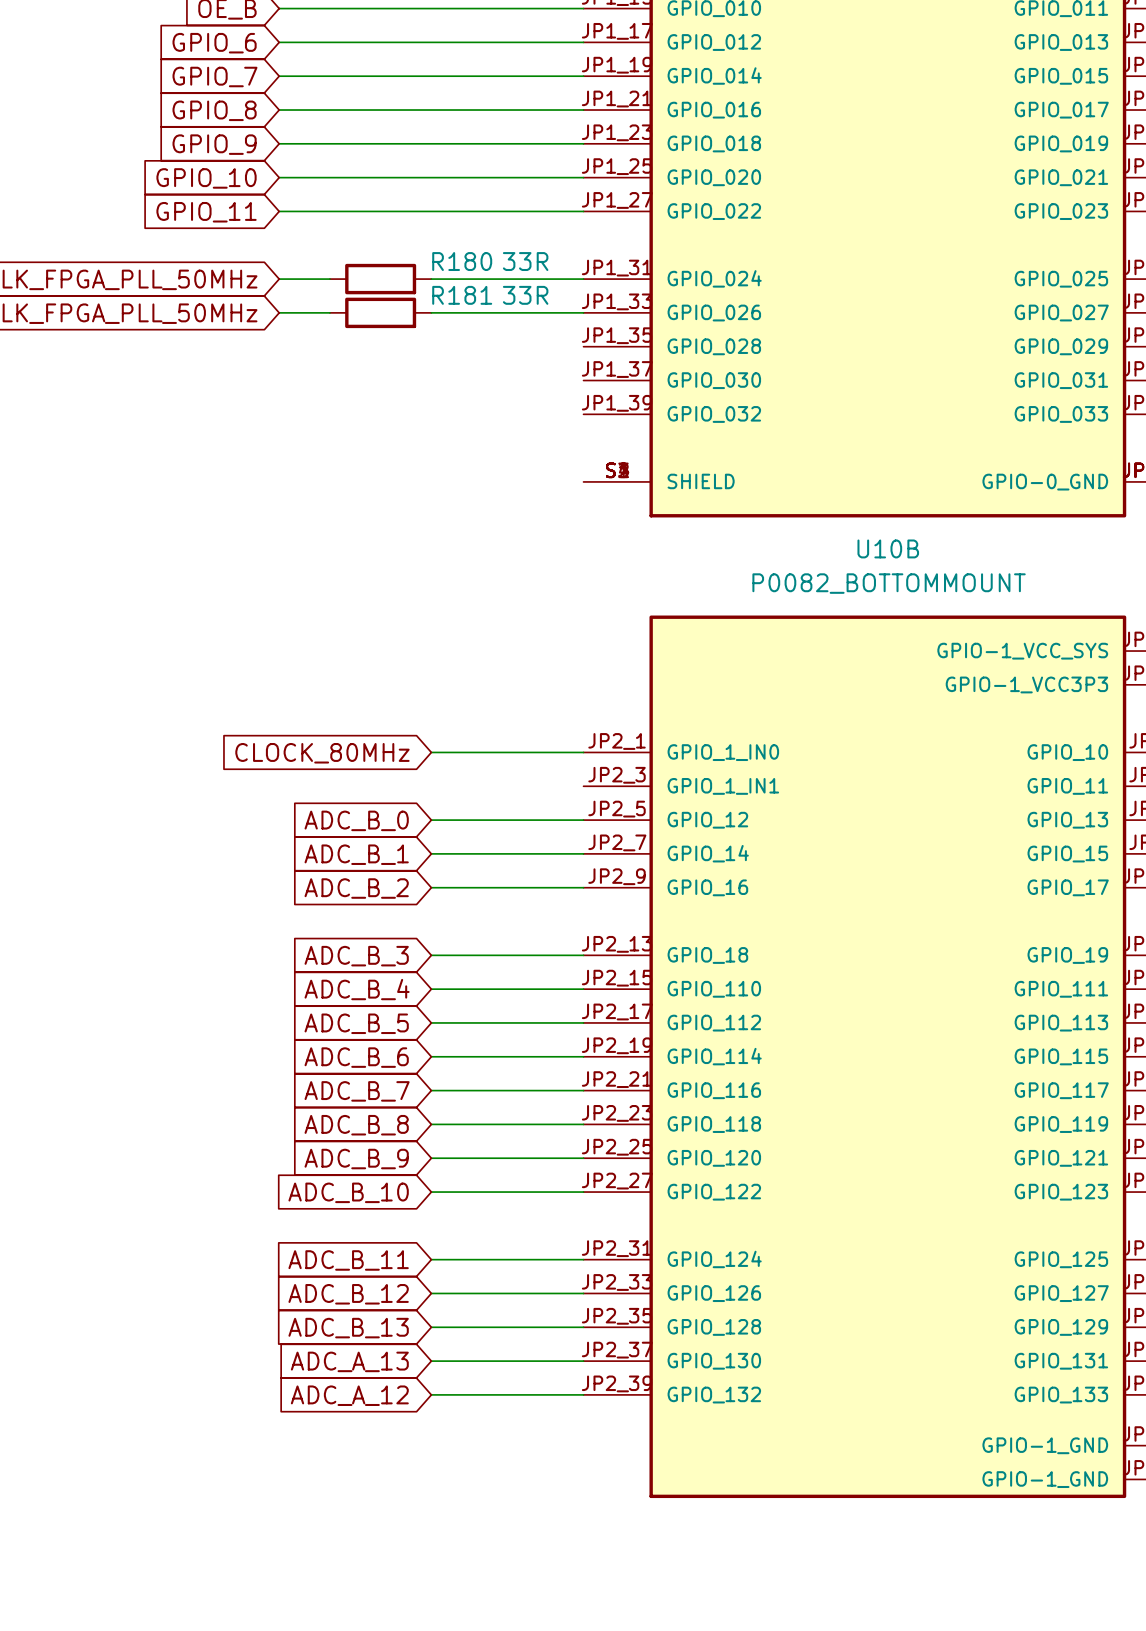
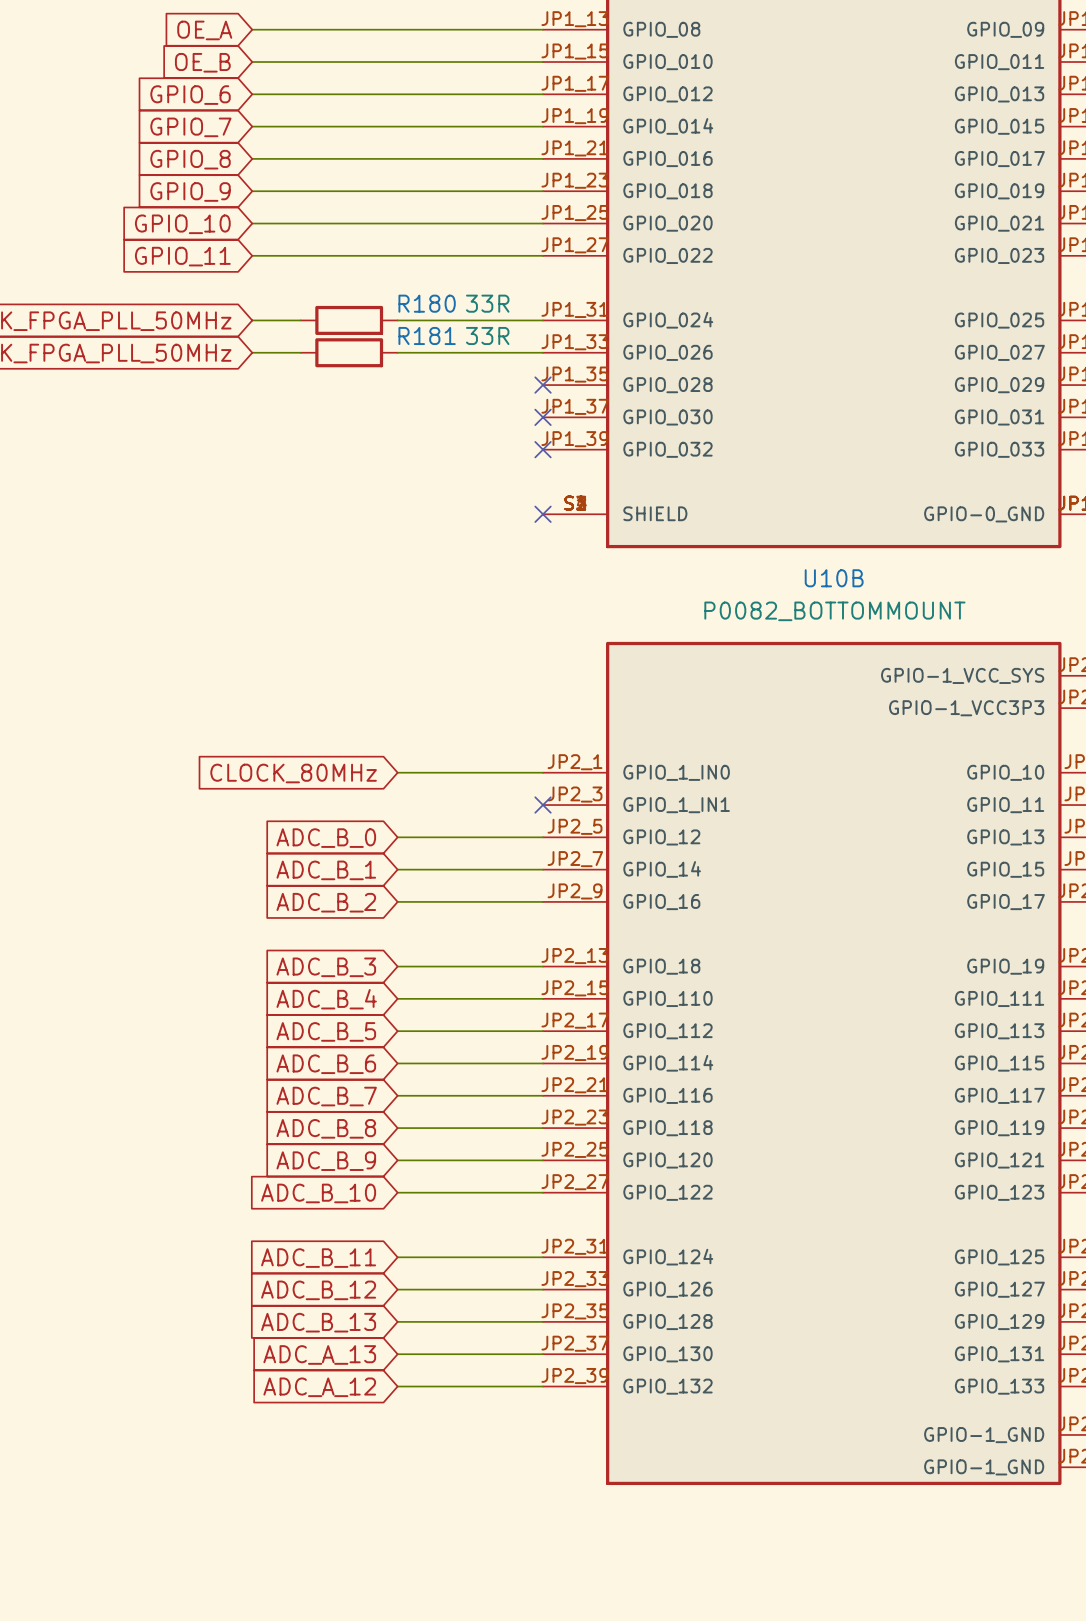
no-connect mark: none -> (543, 385)
no-connect mark: none -> (543, 417)
no-connect mark: none -> (543, 449)
no-connect mark: none -> (543, 514)
no-connect mark: none -> (543, 805)

